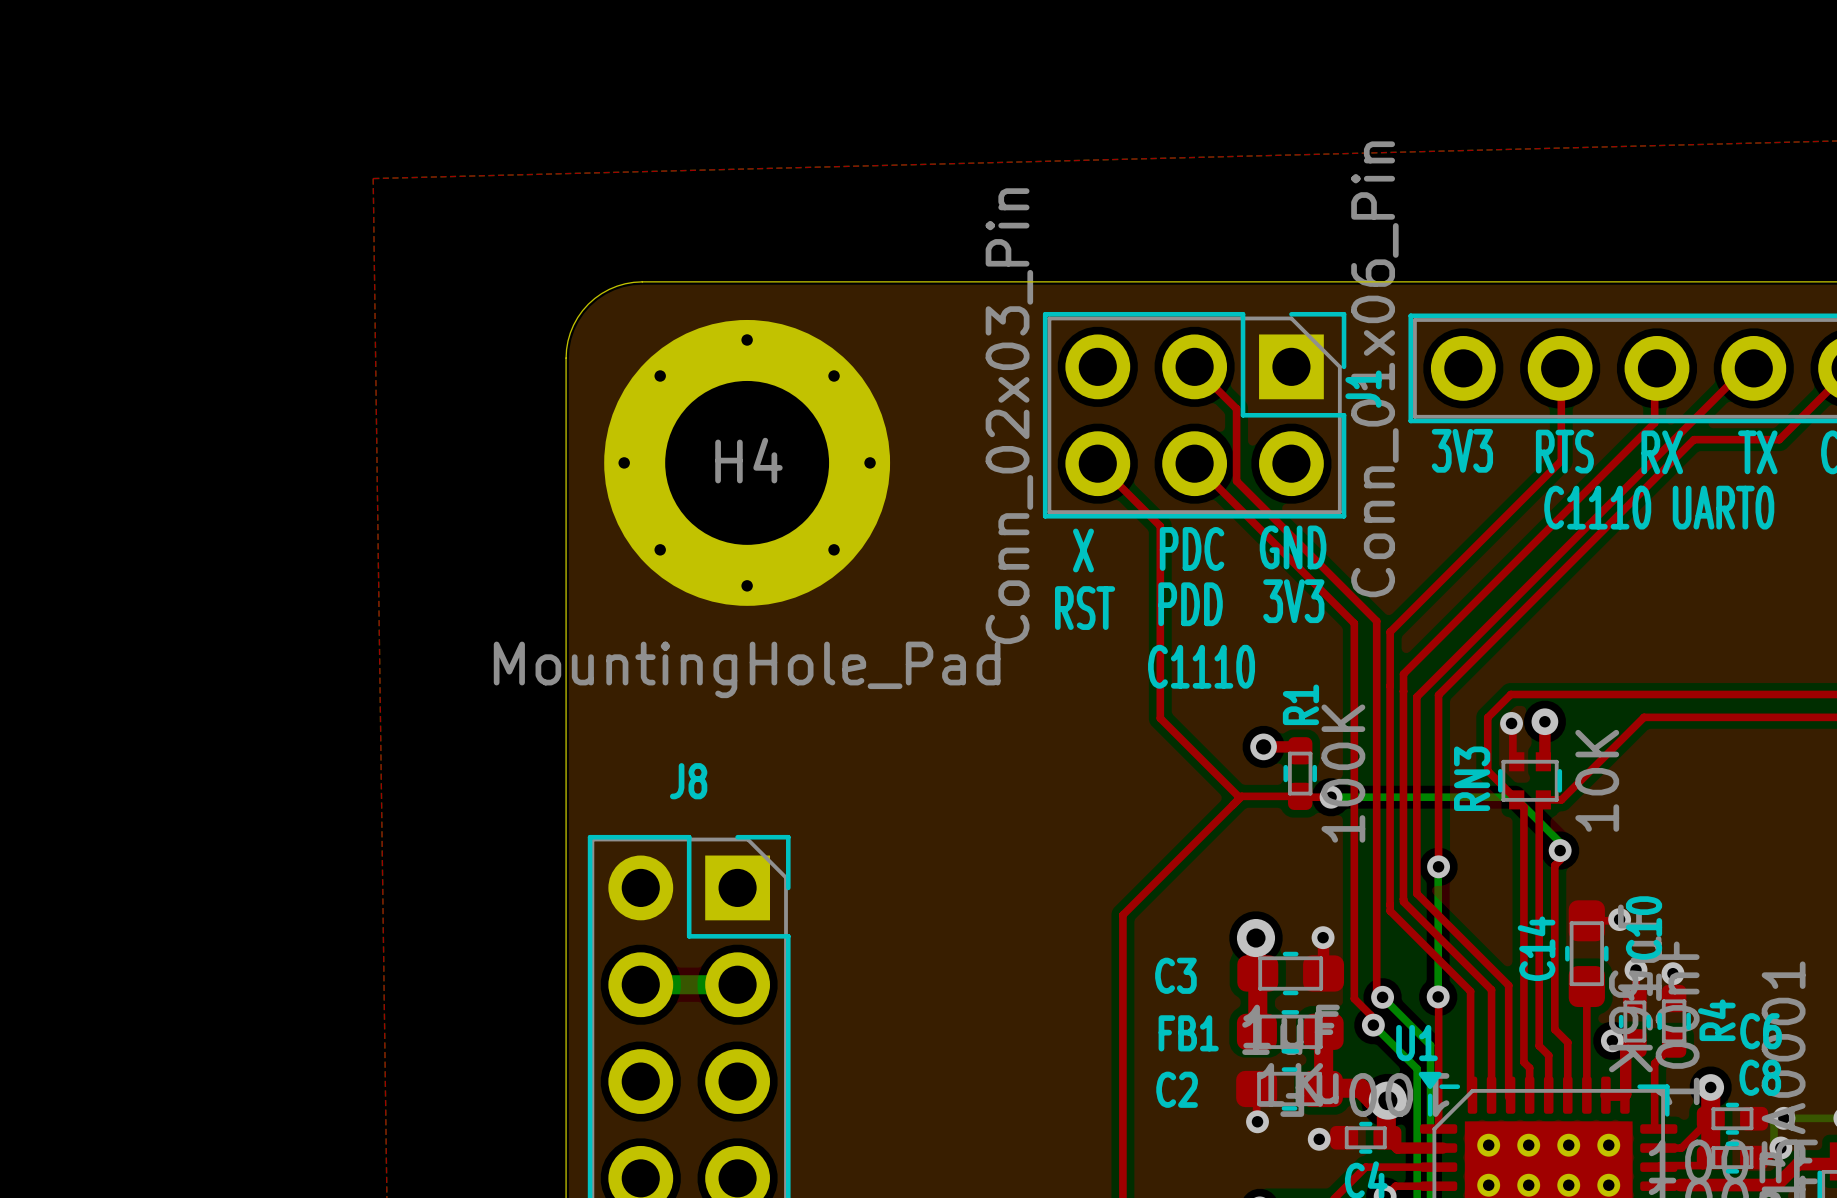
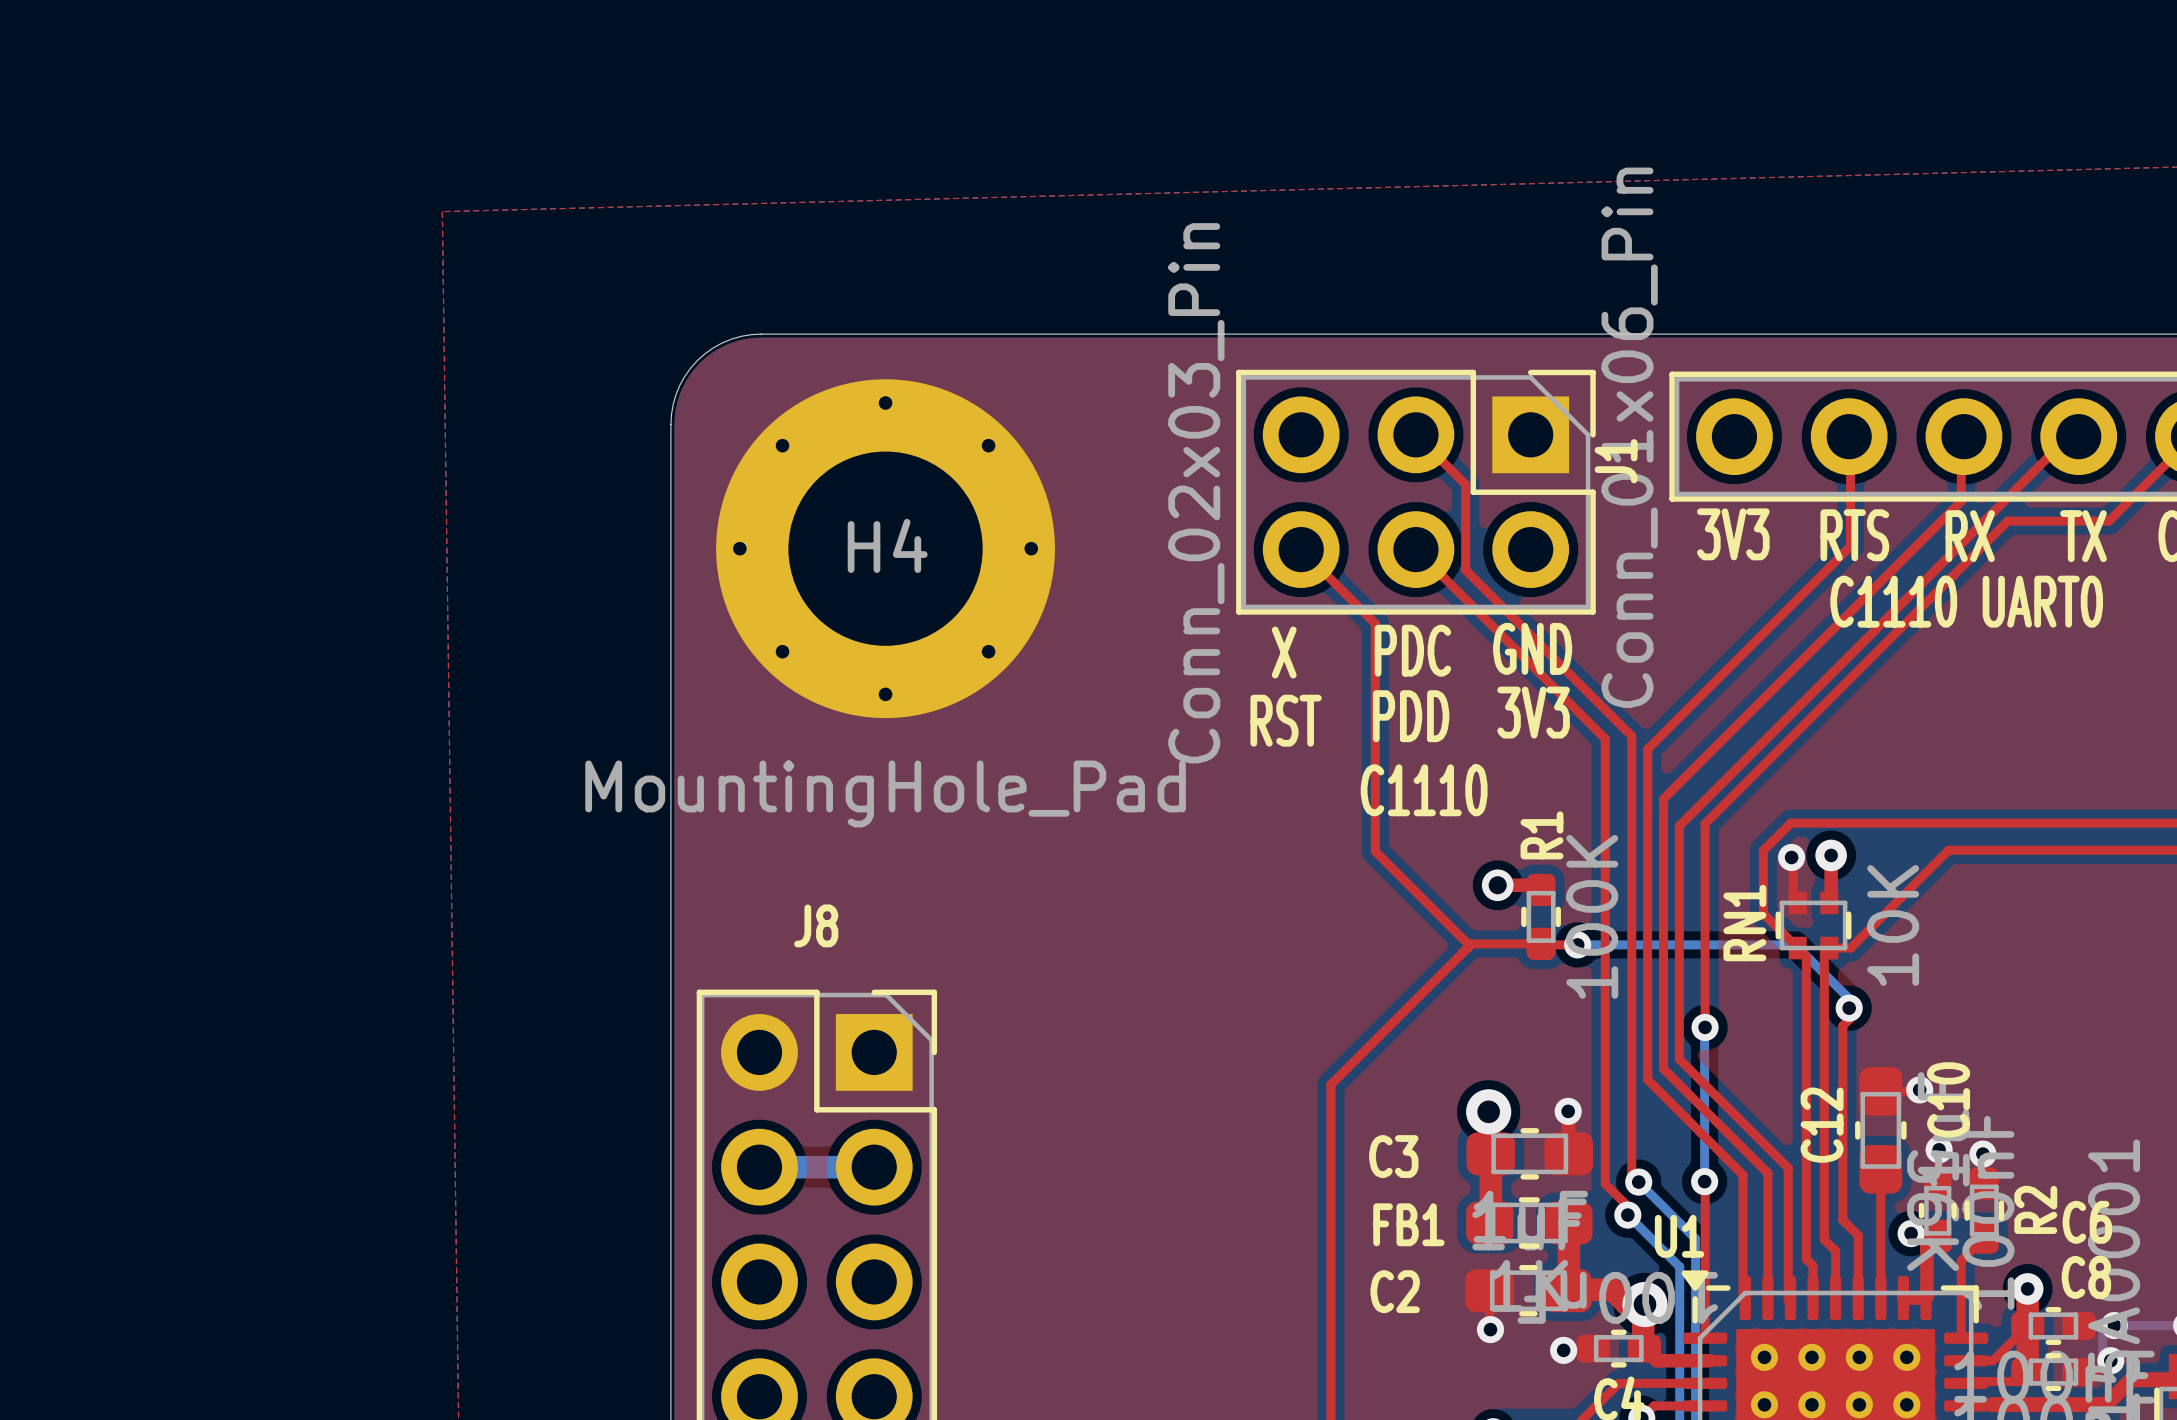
RN3 name: RN3 (1472, 778) -> RN1 (1744, 923)
C14 name: C14 (1536, 948) -> C12 (1822, 1125)
R4 name: R4 (1716, 1020) -> R2 (2035, 1209)

